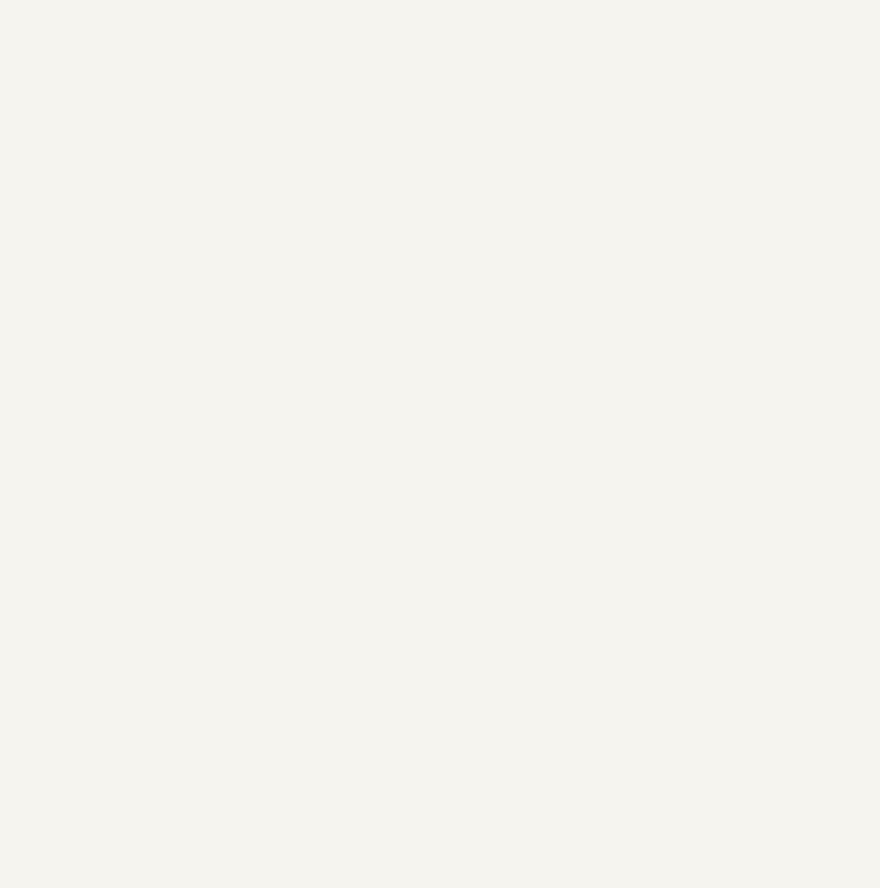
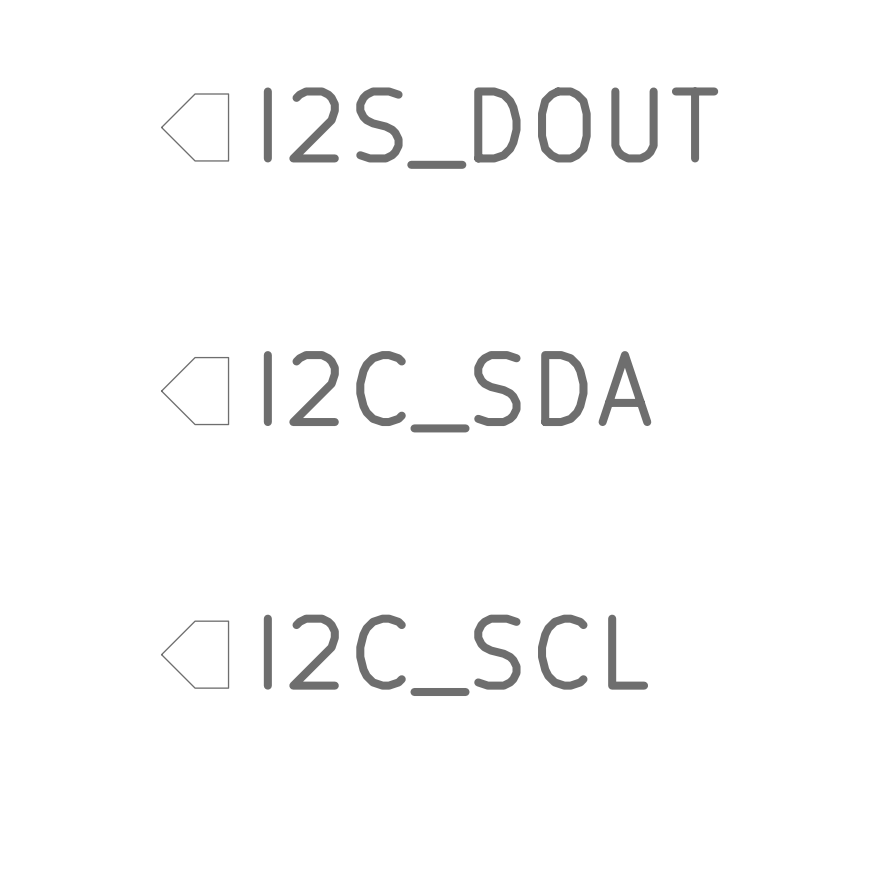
hierarchical label: none -> I2S_DOUT (491, 128)
hierarchical label: none -> I2C_SDA (457, 391)
hierarchical label: none -> I2C_SCL (455, 655)

